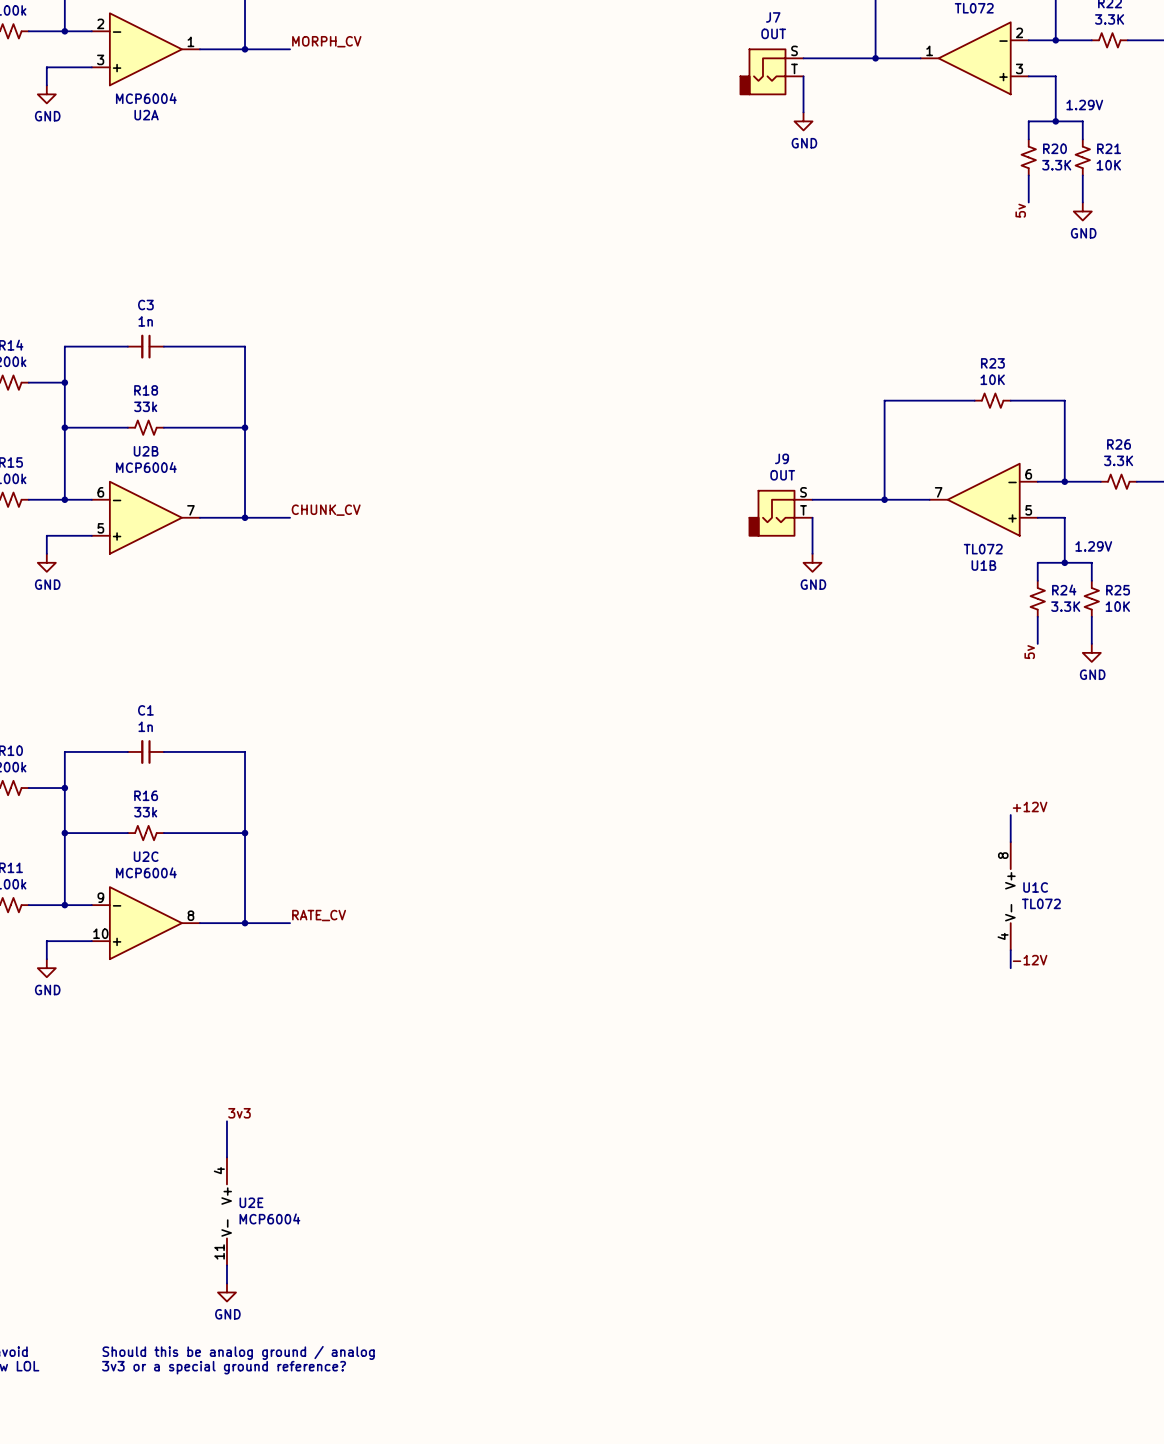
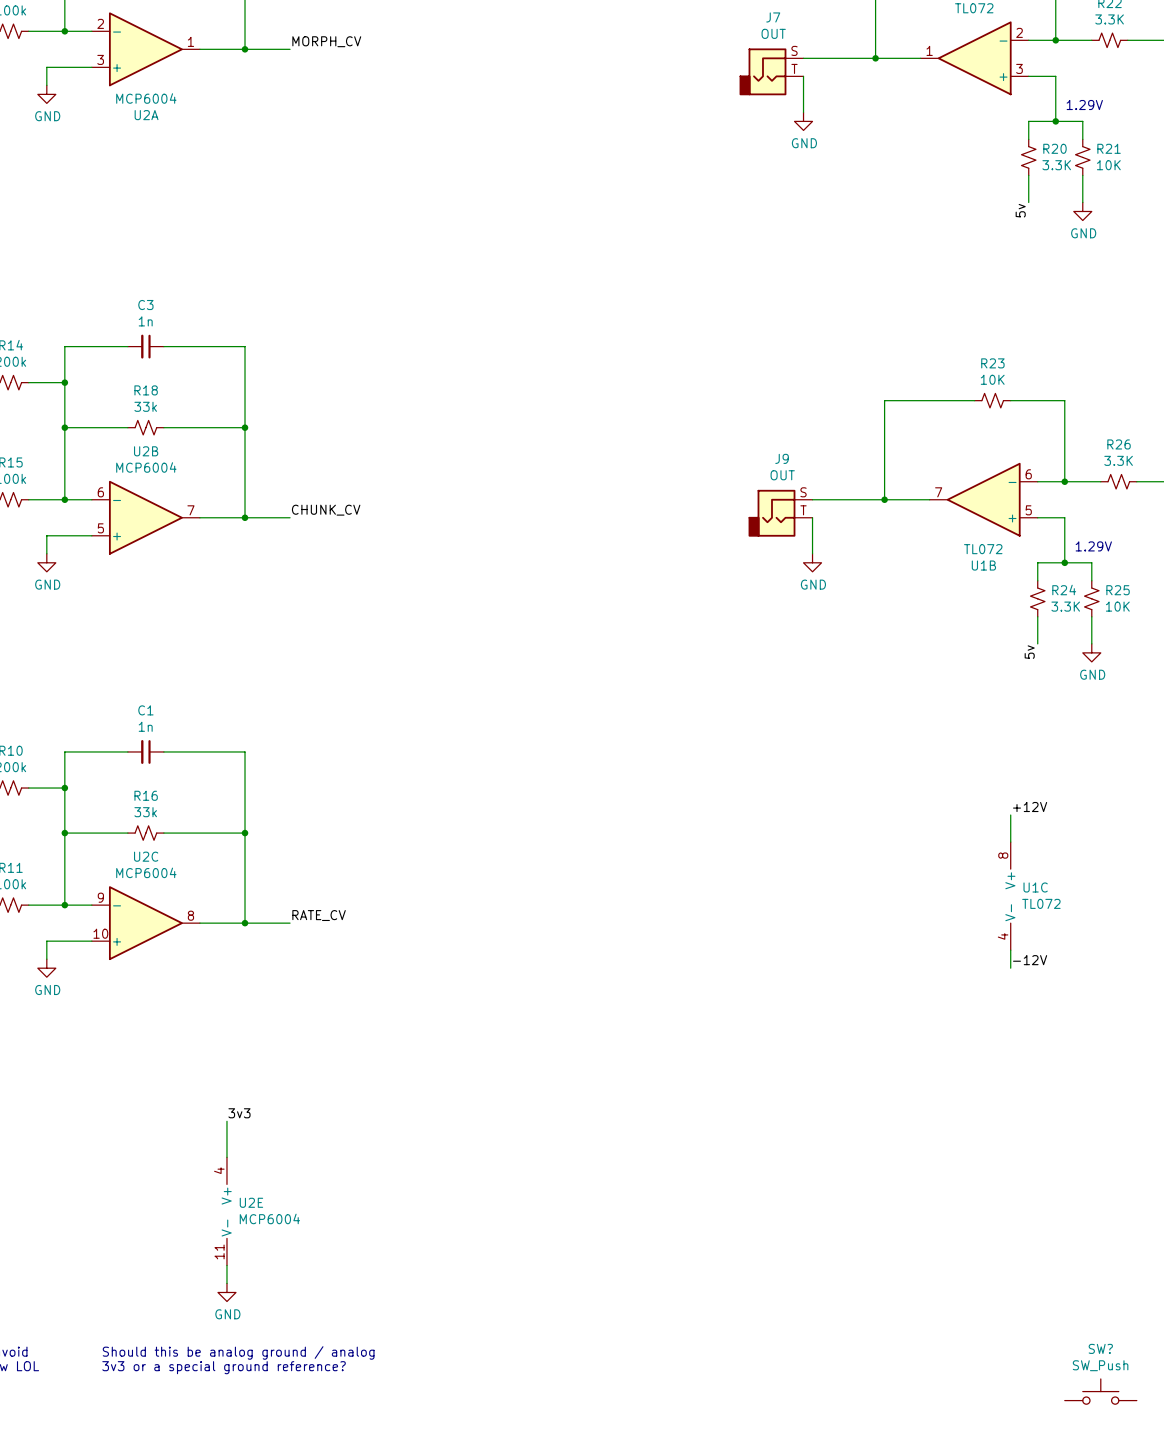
SW?: none -> SW_Push (1100, 1391)

